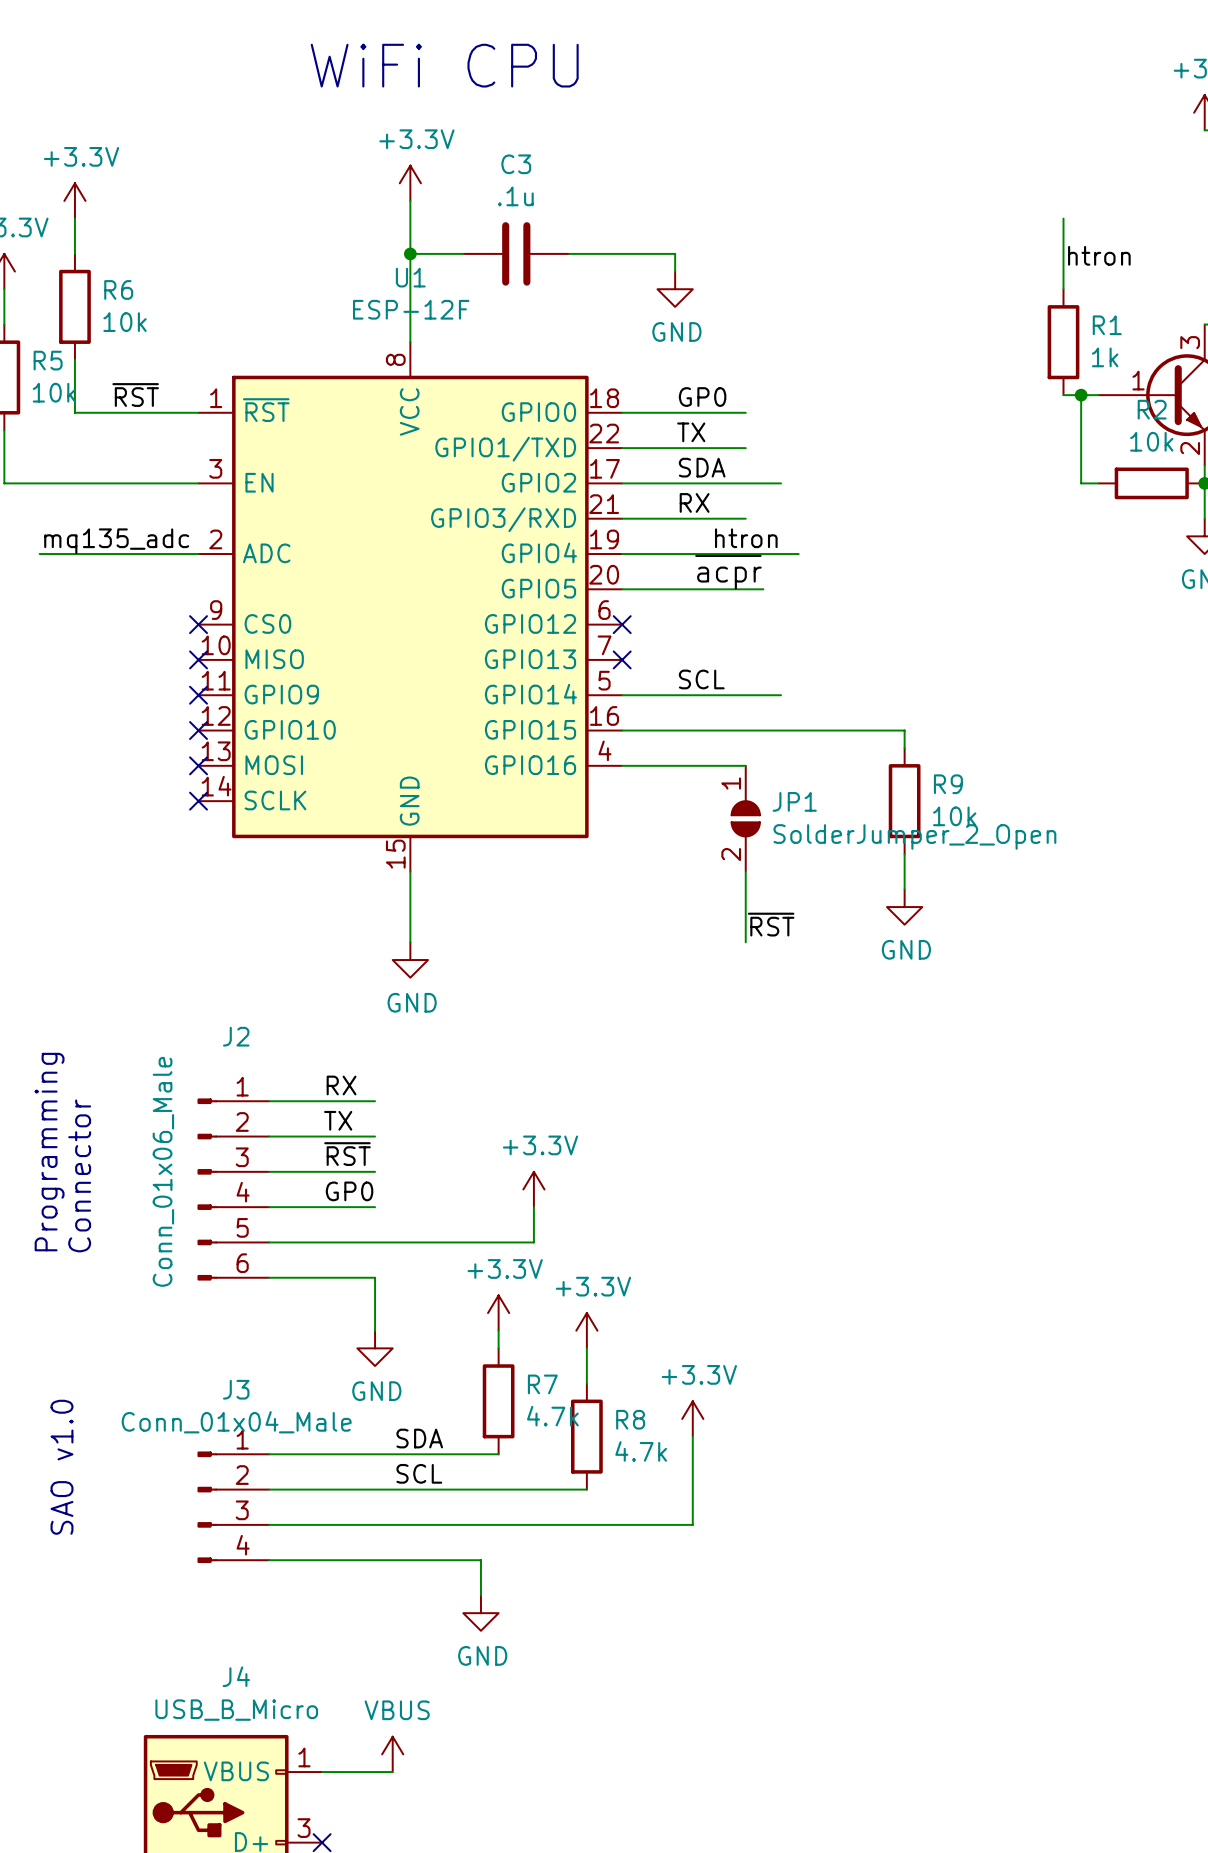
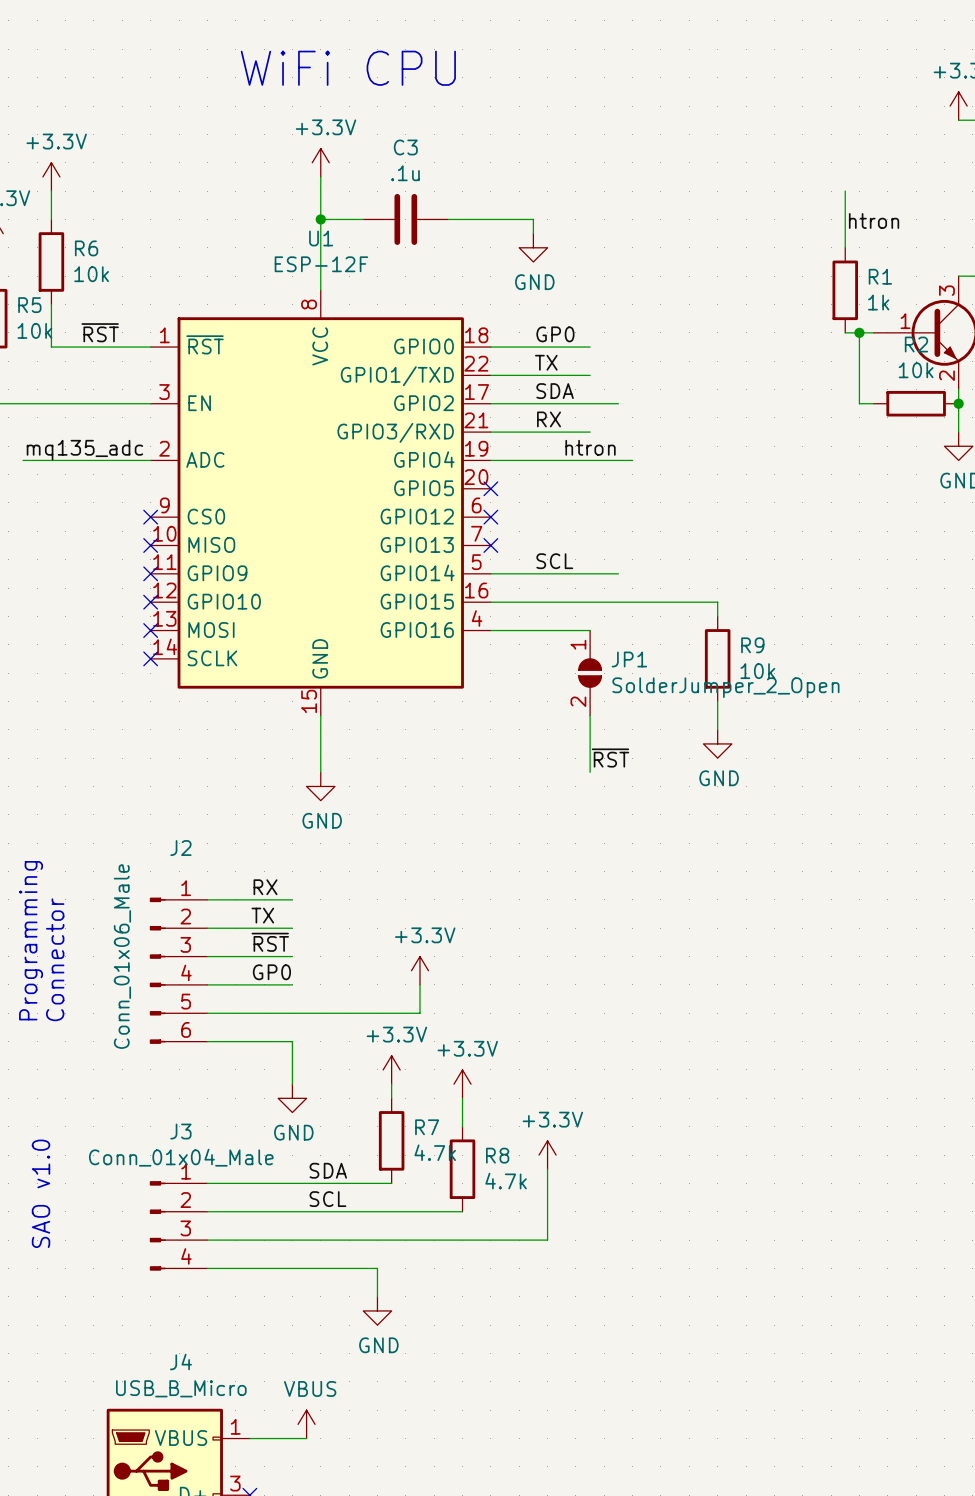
label: ~{acpr} (728, 572) -> none
wire: (622, 589) (763, 589) -> none
no-connect mark: none -> (490, 488)

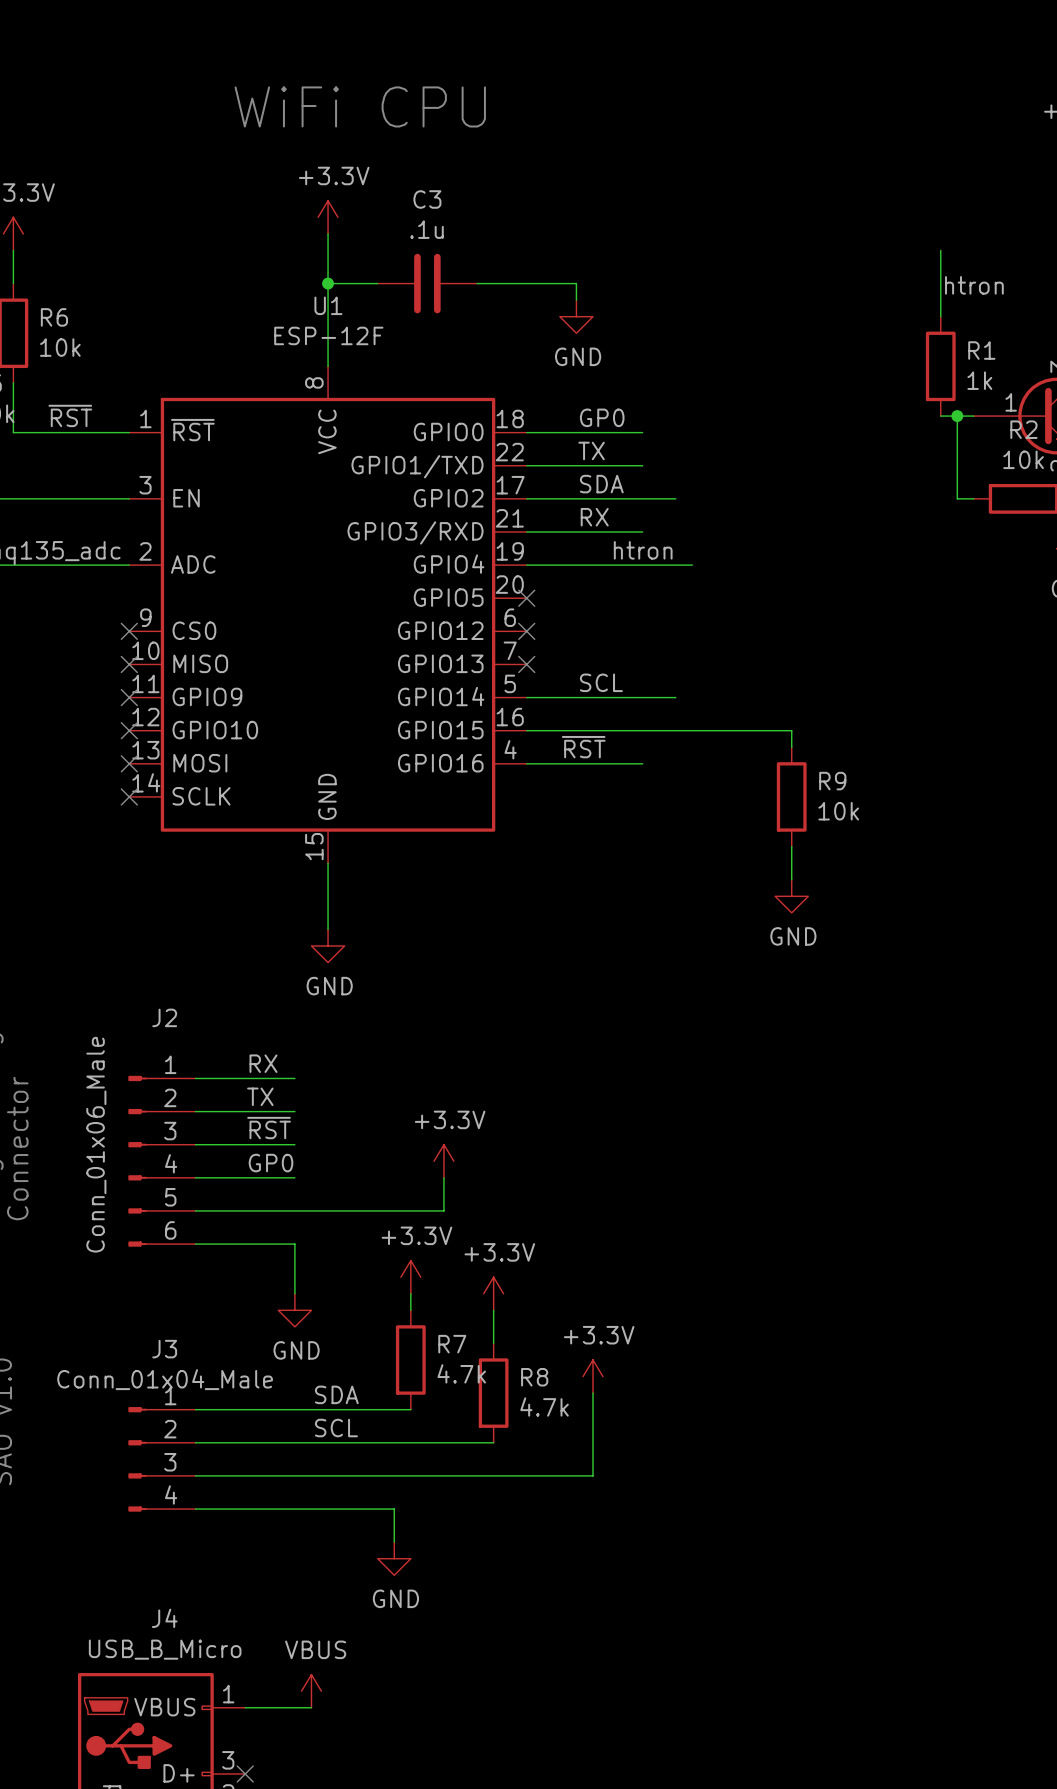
JP1: SolderJumper_2_Open (590, 673) -> none
wire: (590, 715) (590, 772) -> none
label position: ~{RST} (610, 758) -> ~{RST} (583, 747)

